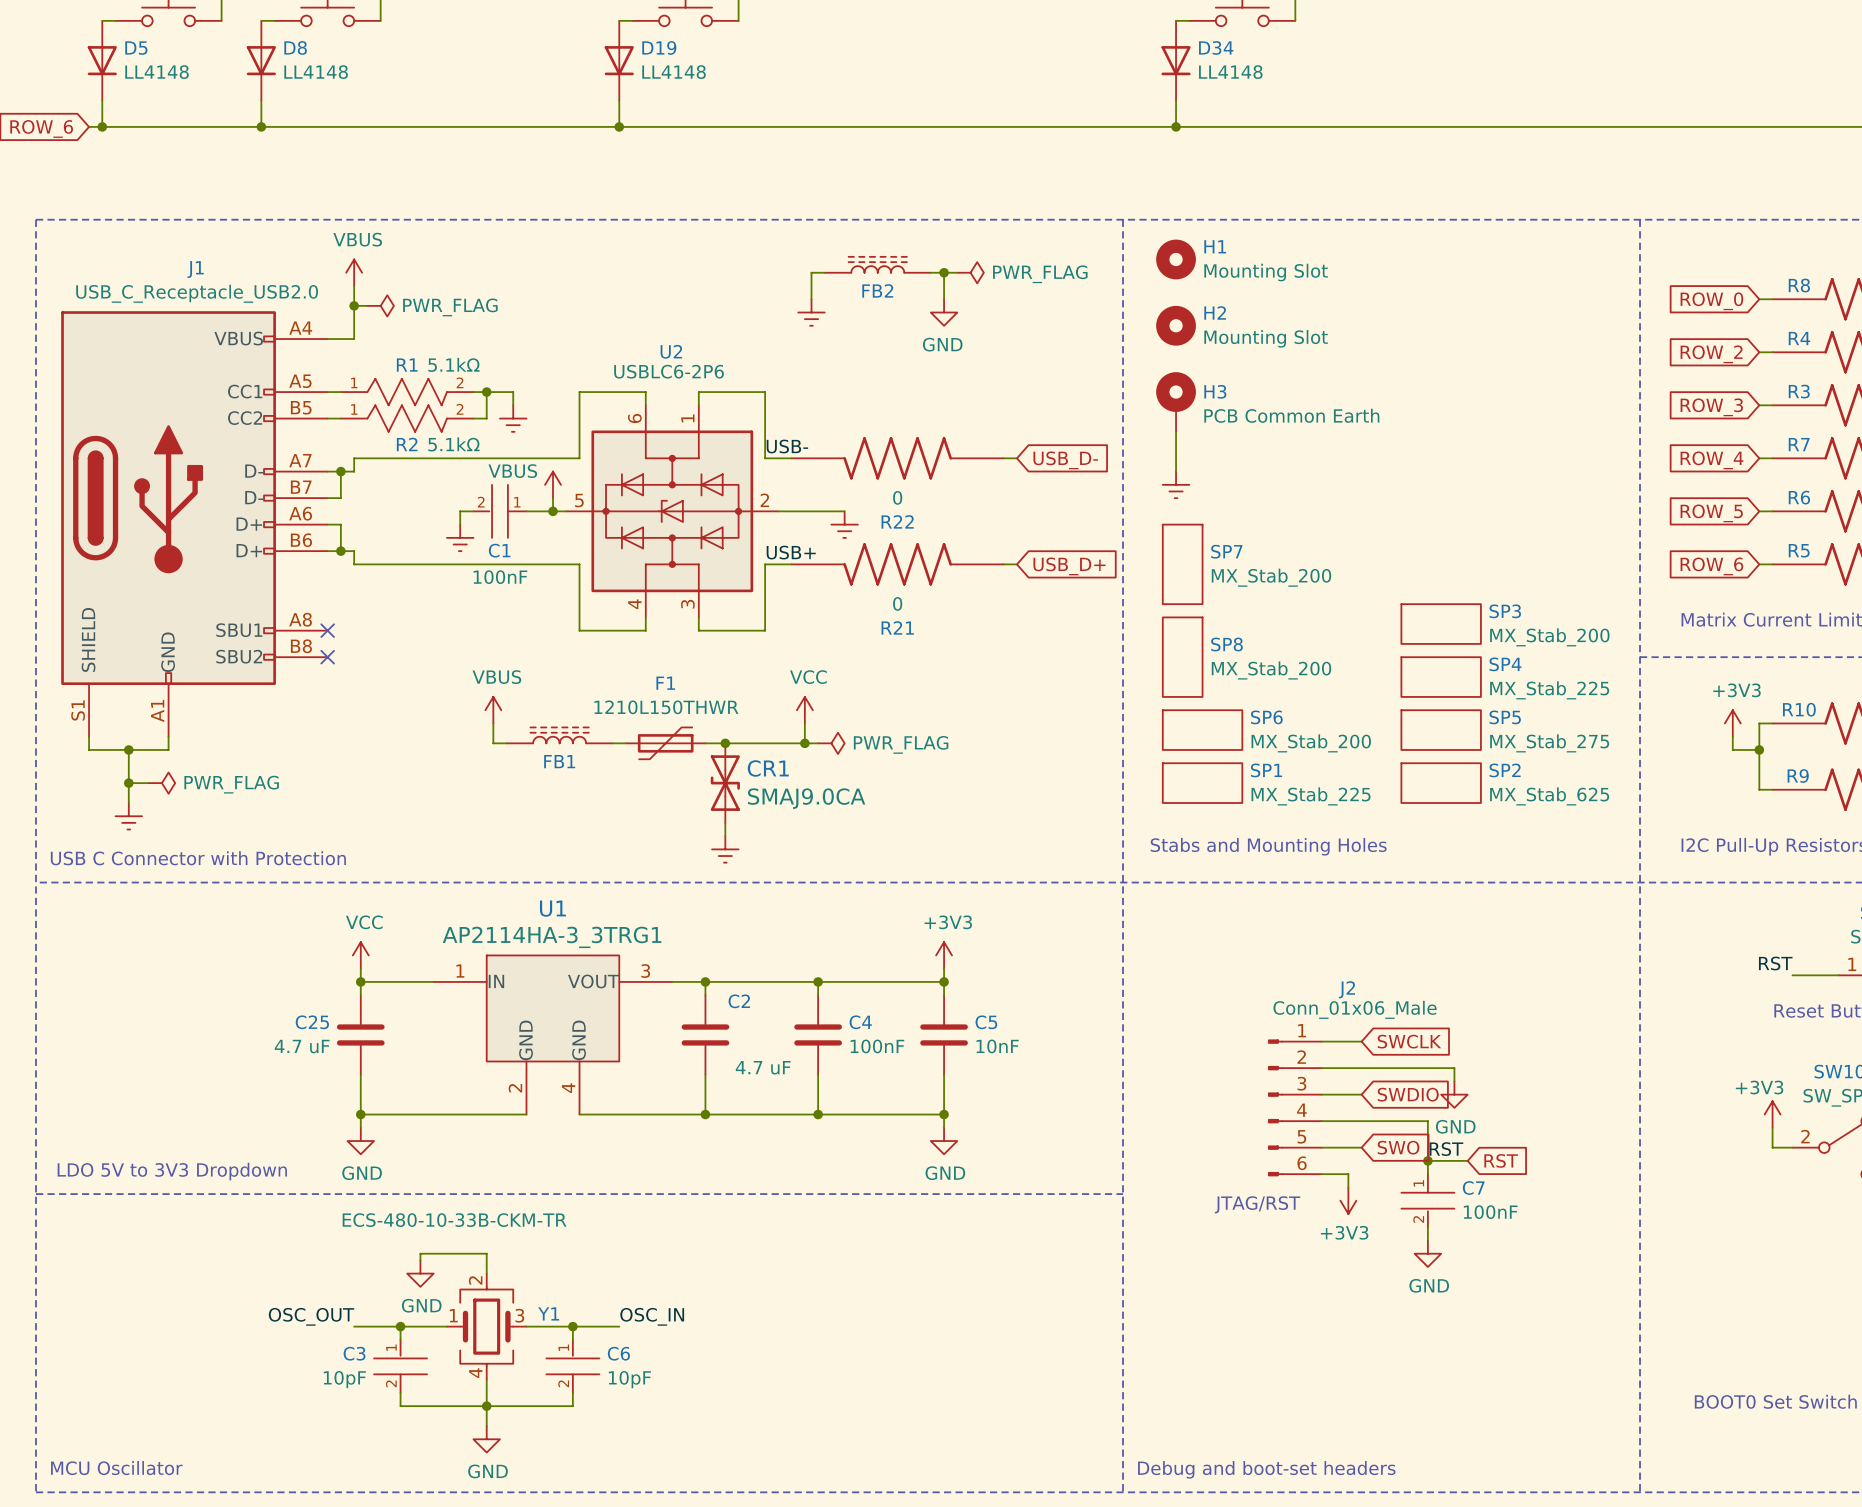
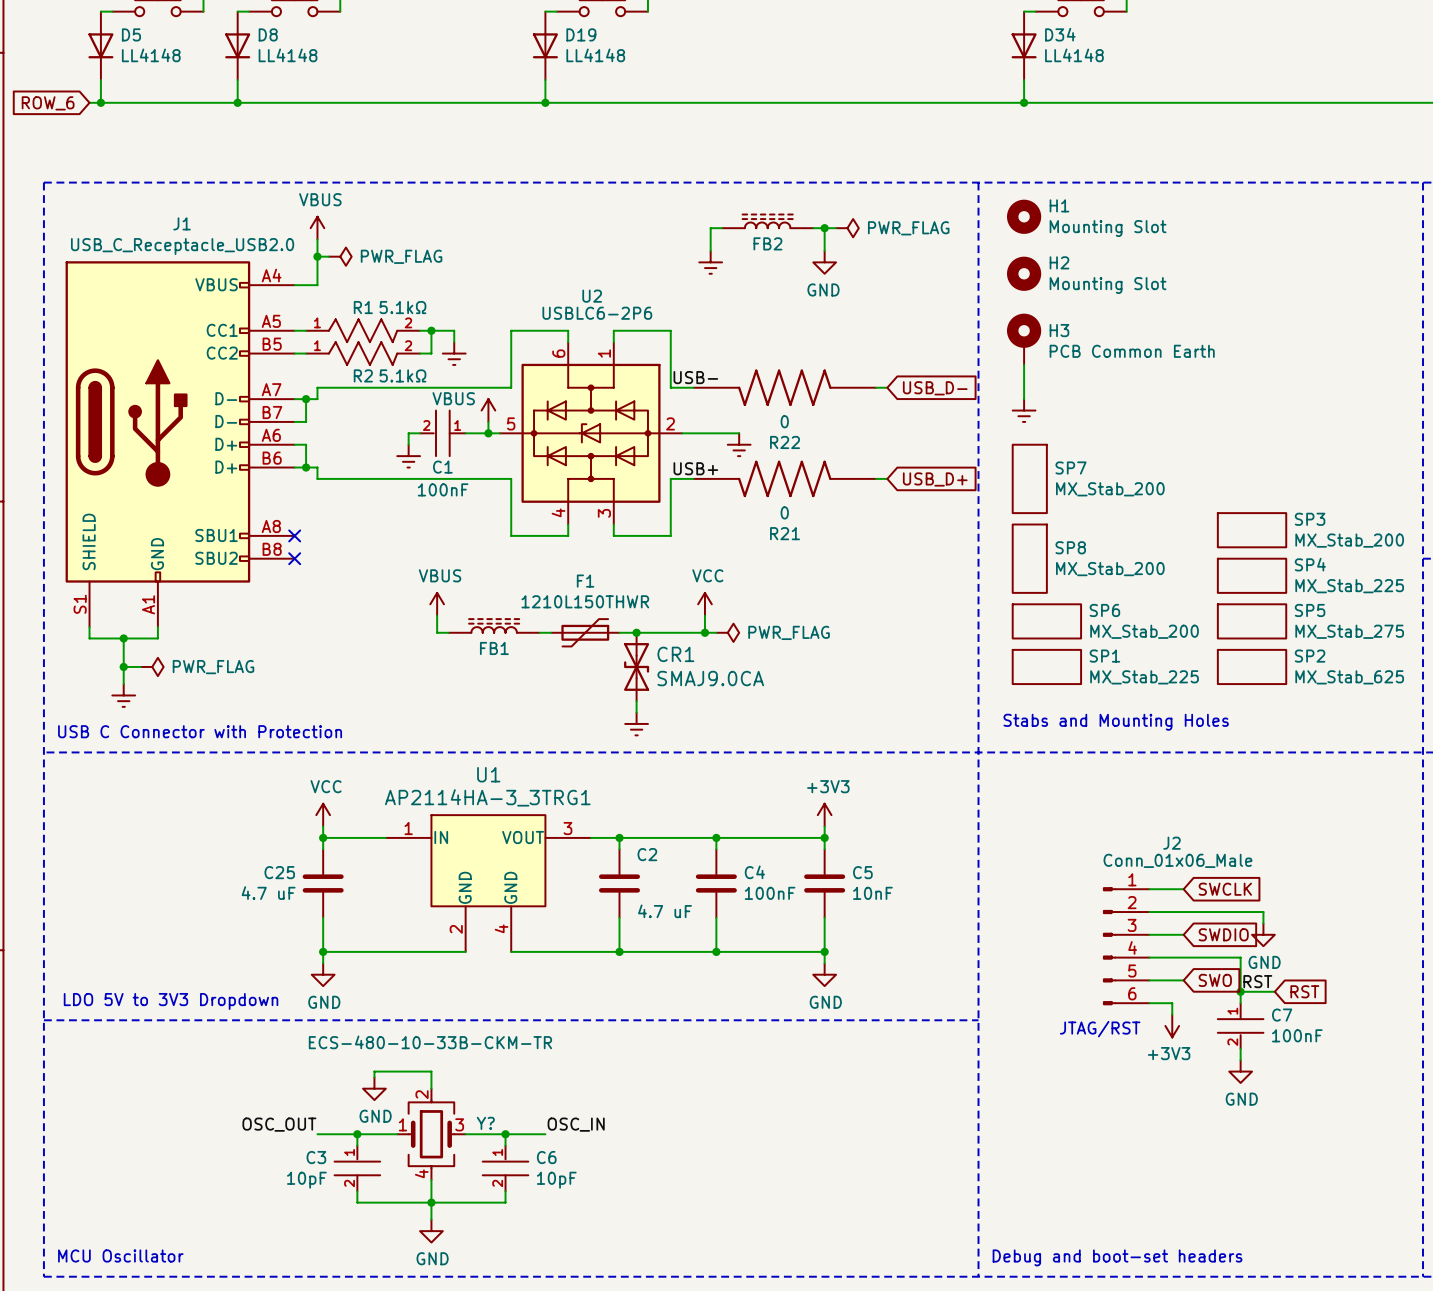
Y1 name: Y1 (548, 1313) -> Y? (485, 1123)

